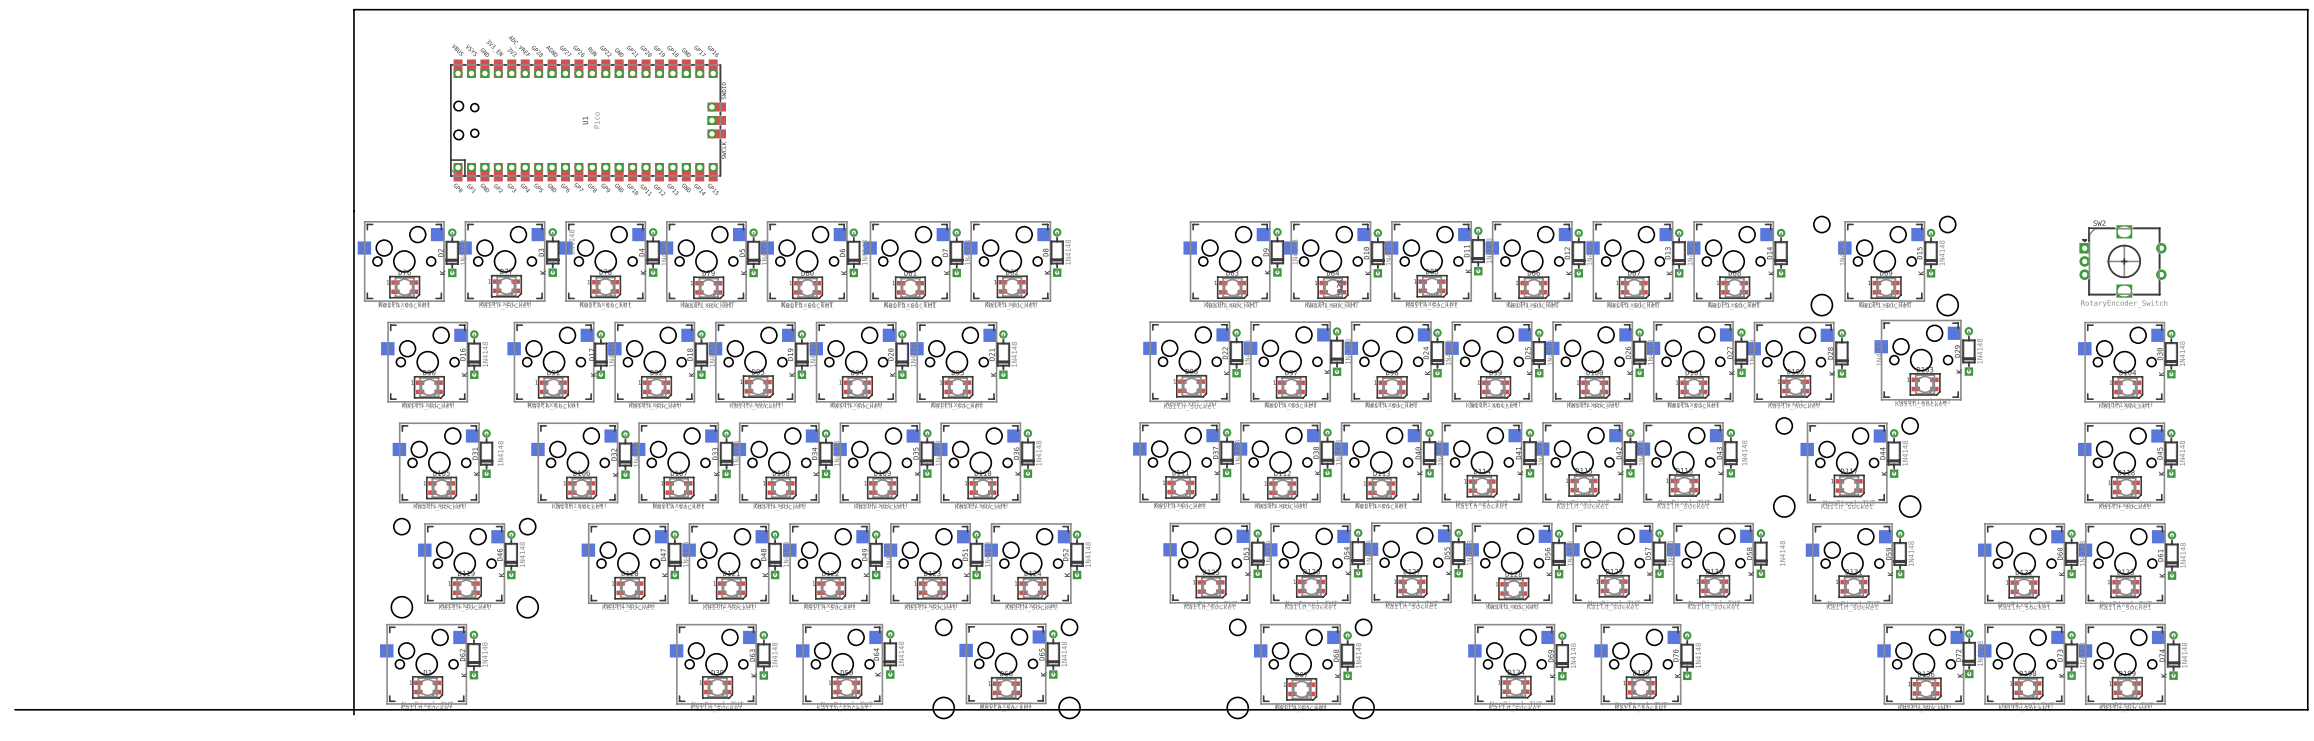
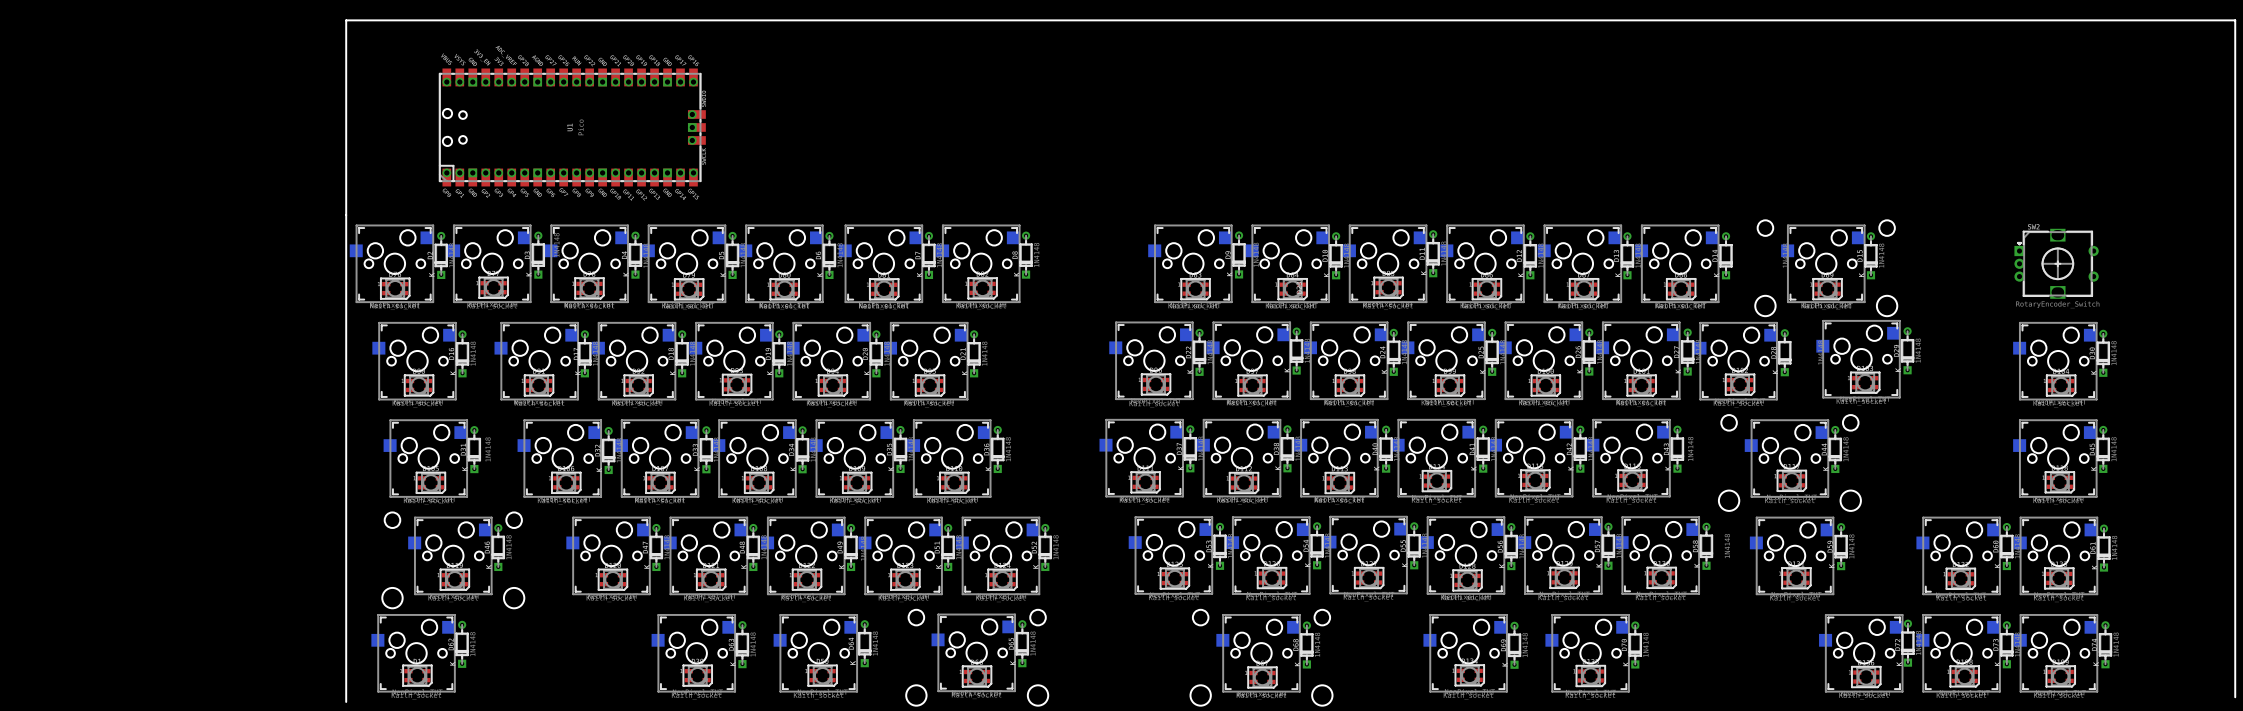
board edge: (15, 709) (2307, 709) -> none

